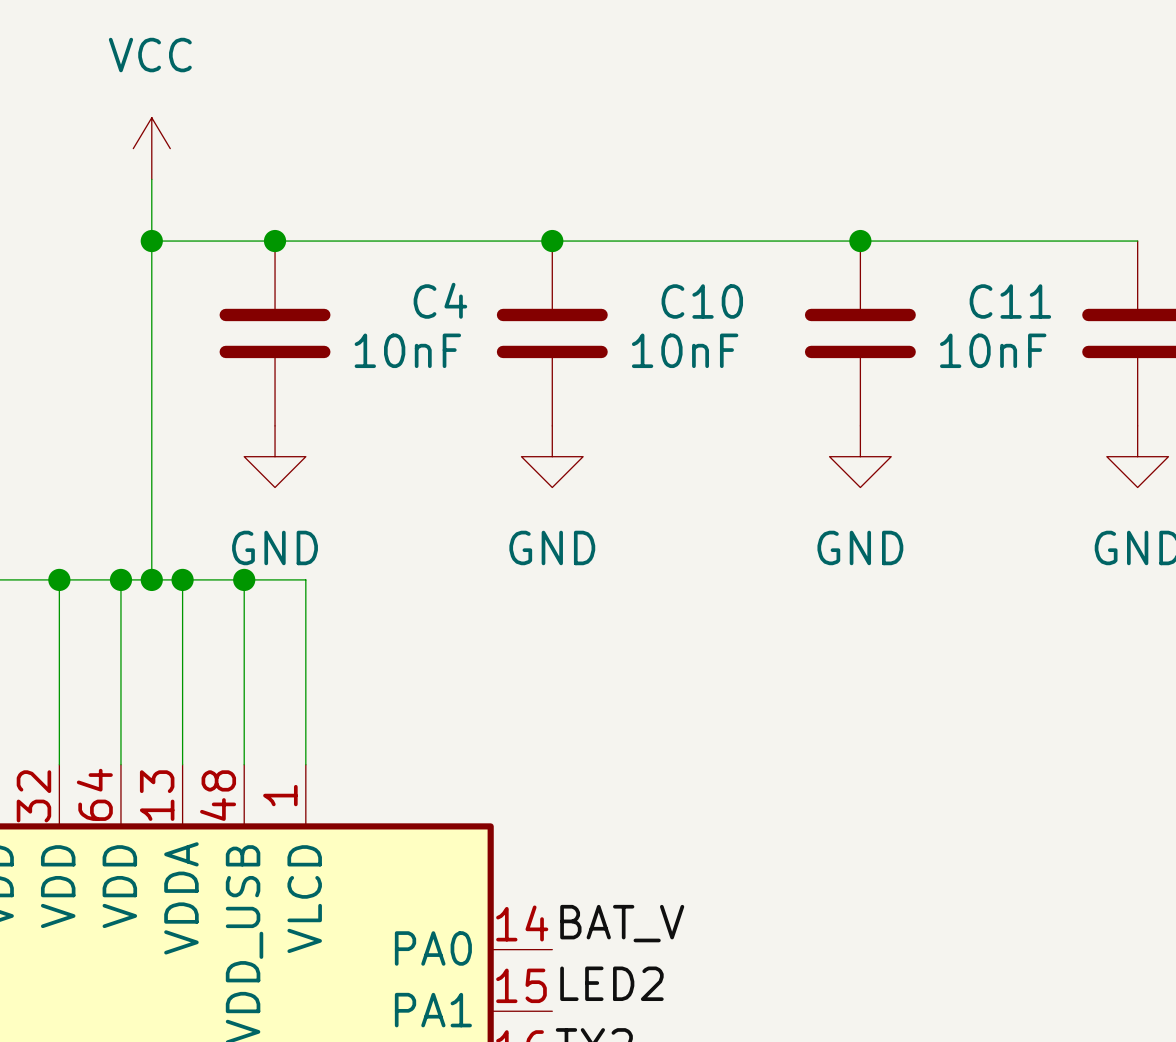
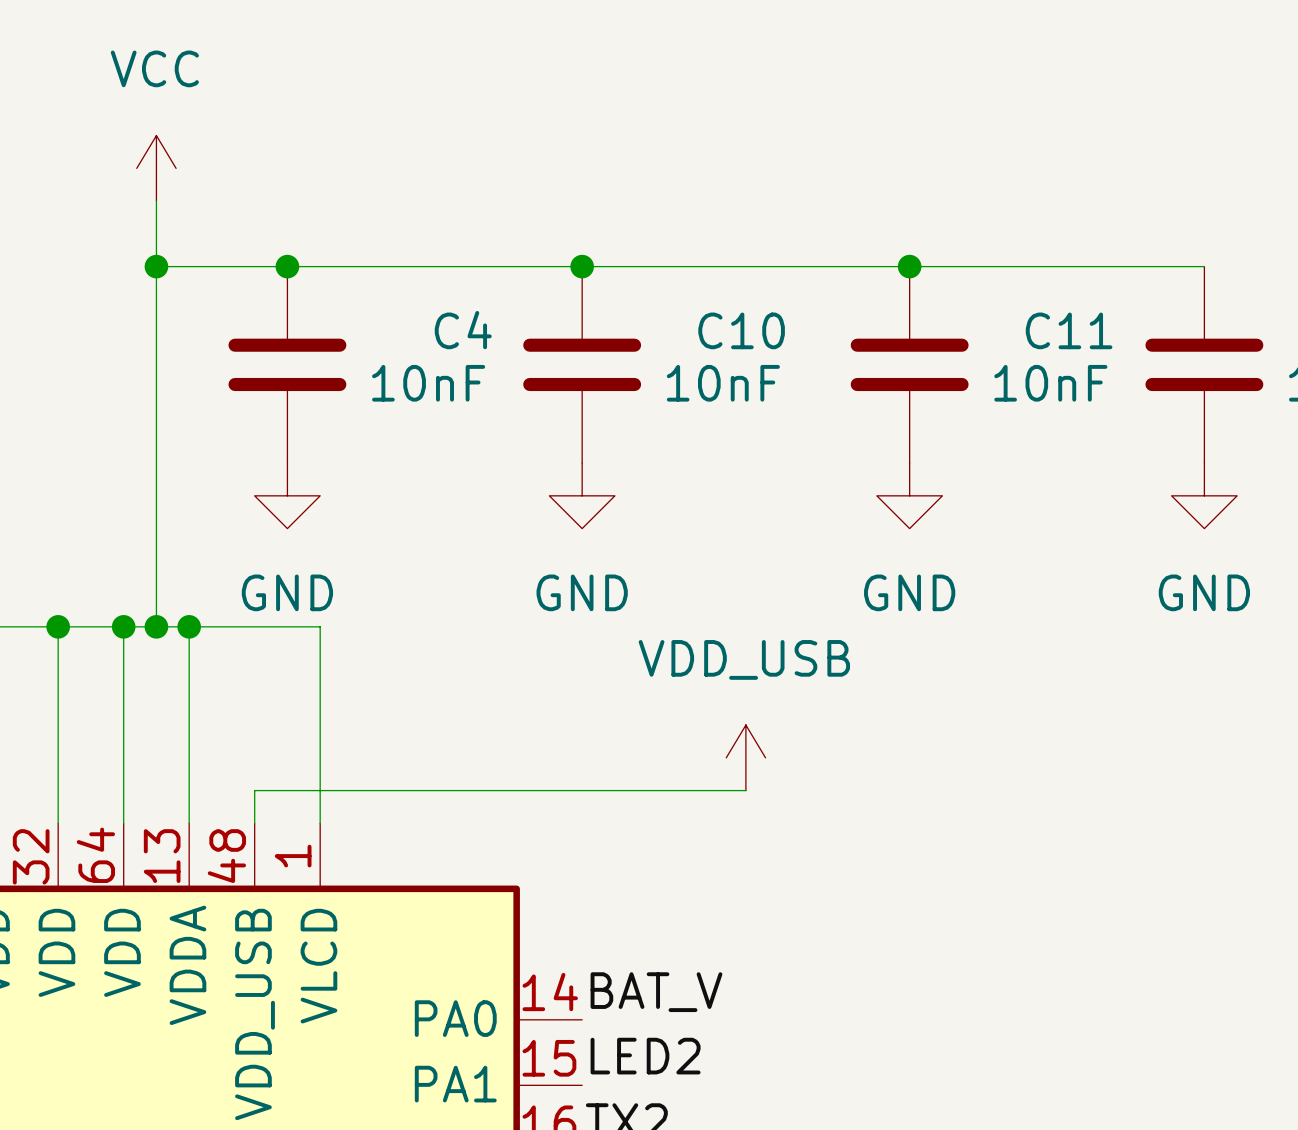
wire: (244, 579) (244, 733) -> (745, 790) (254, 790)
junction: (244, 579) -> none
power symbol: none -> VDD_USB (745, 757)

